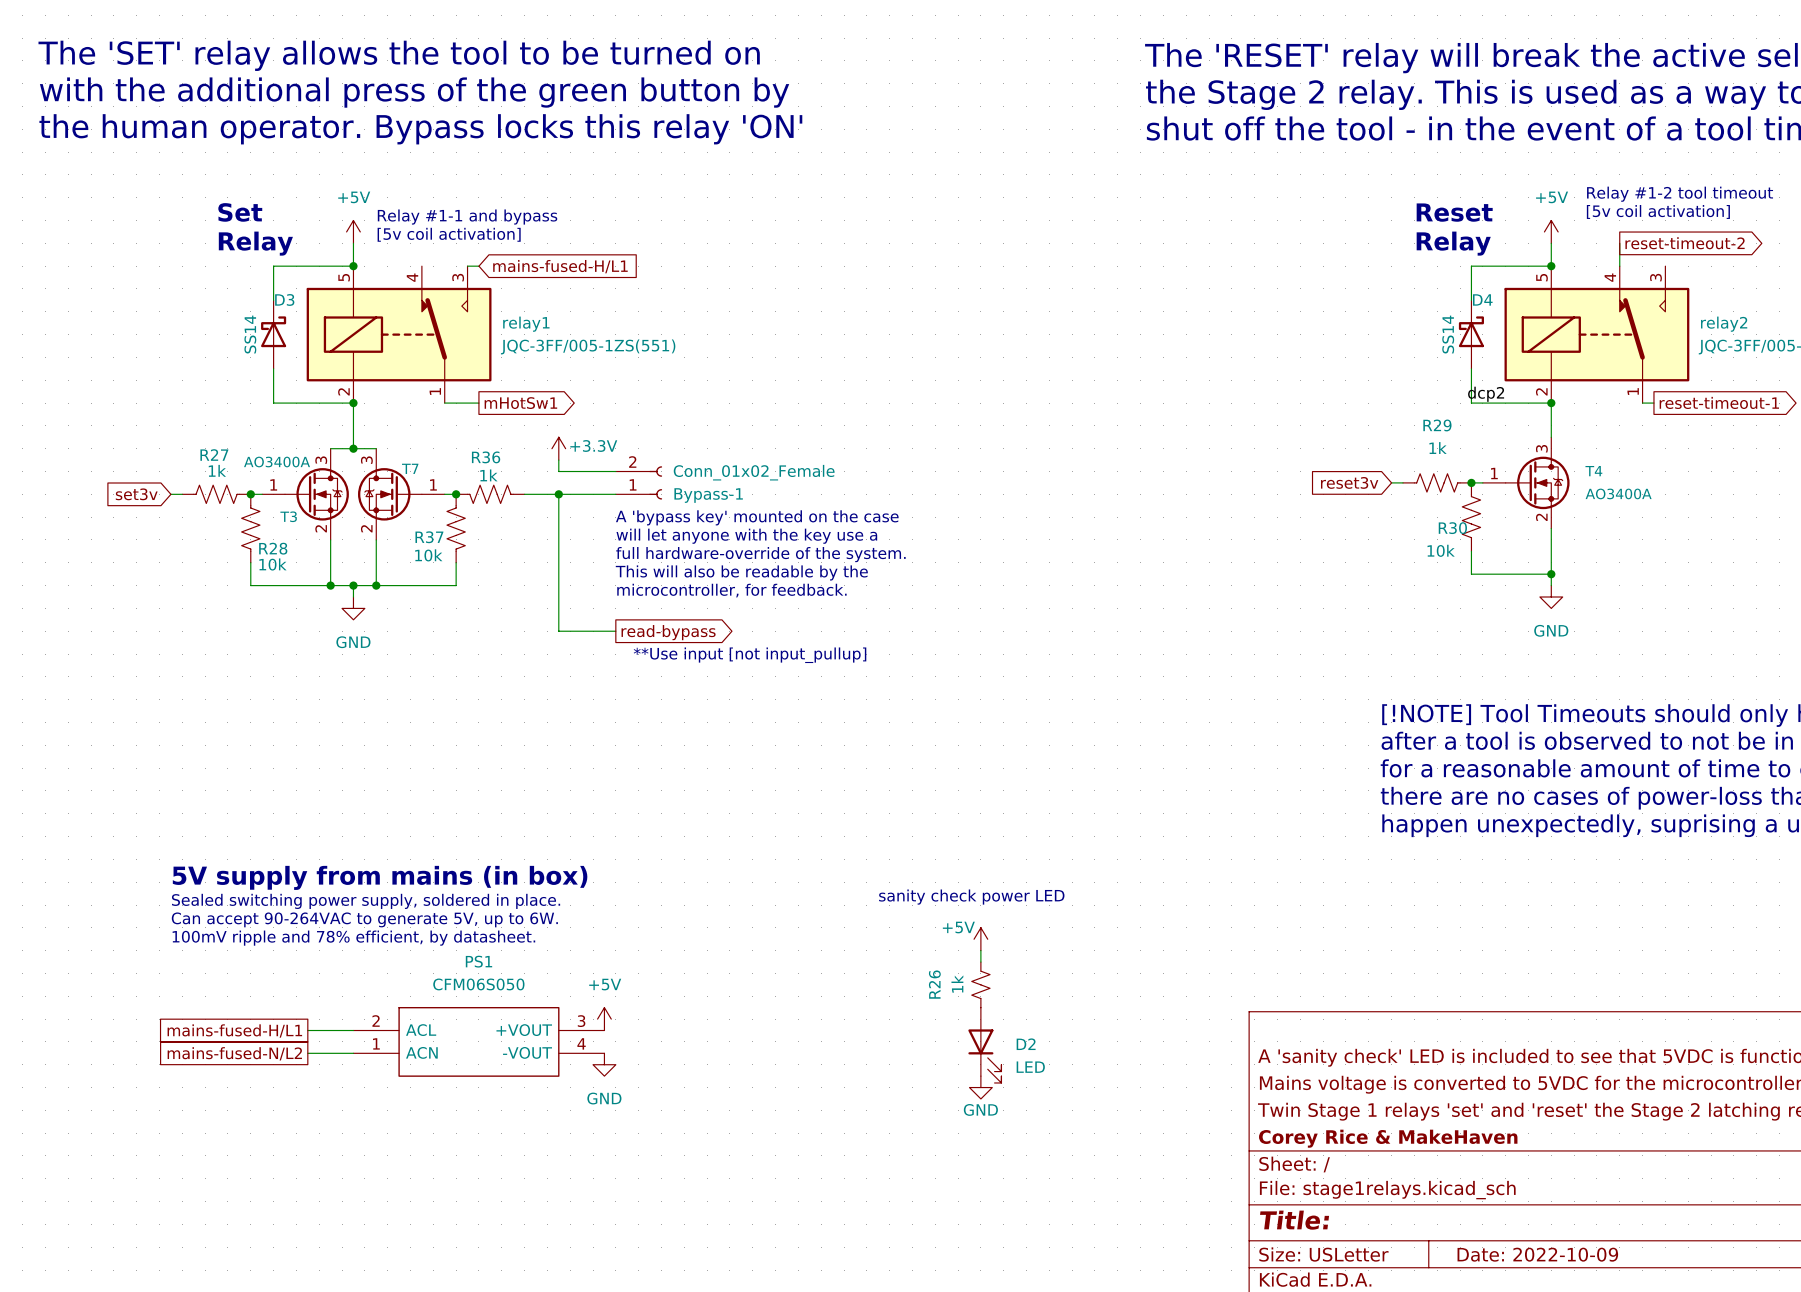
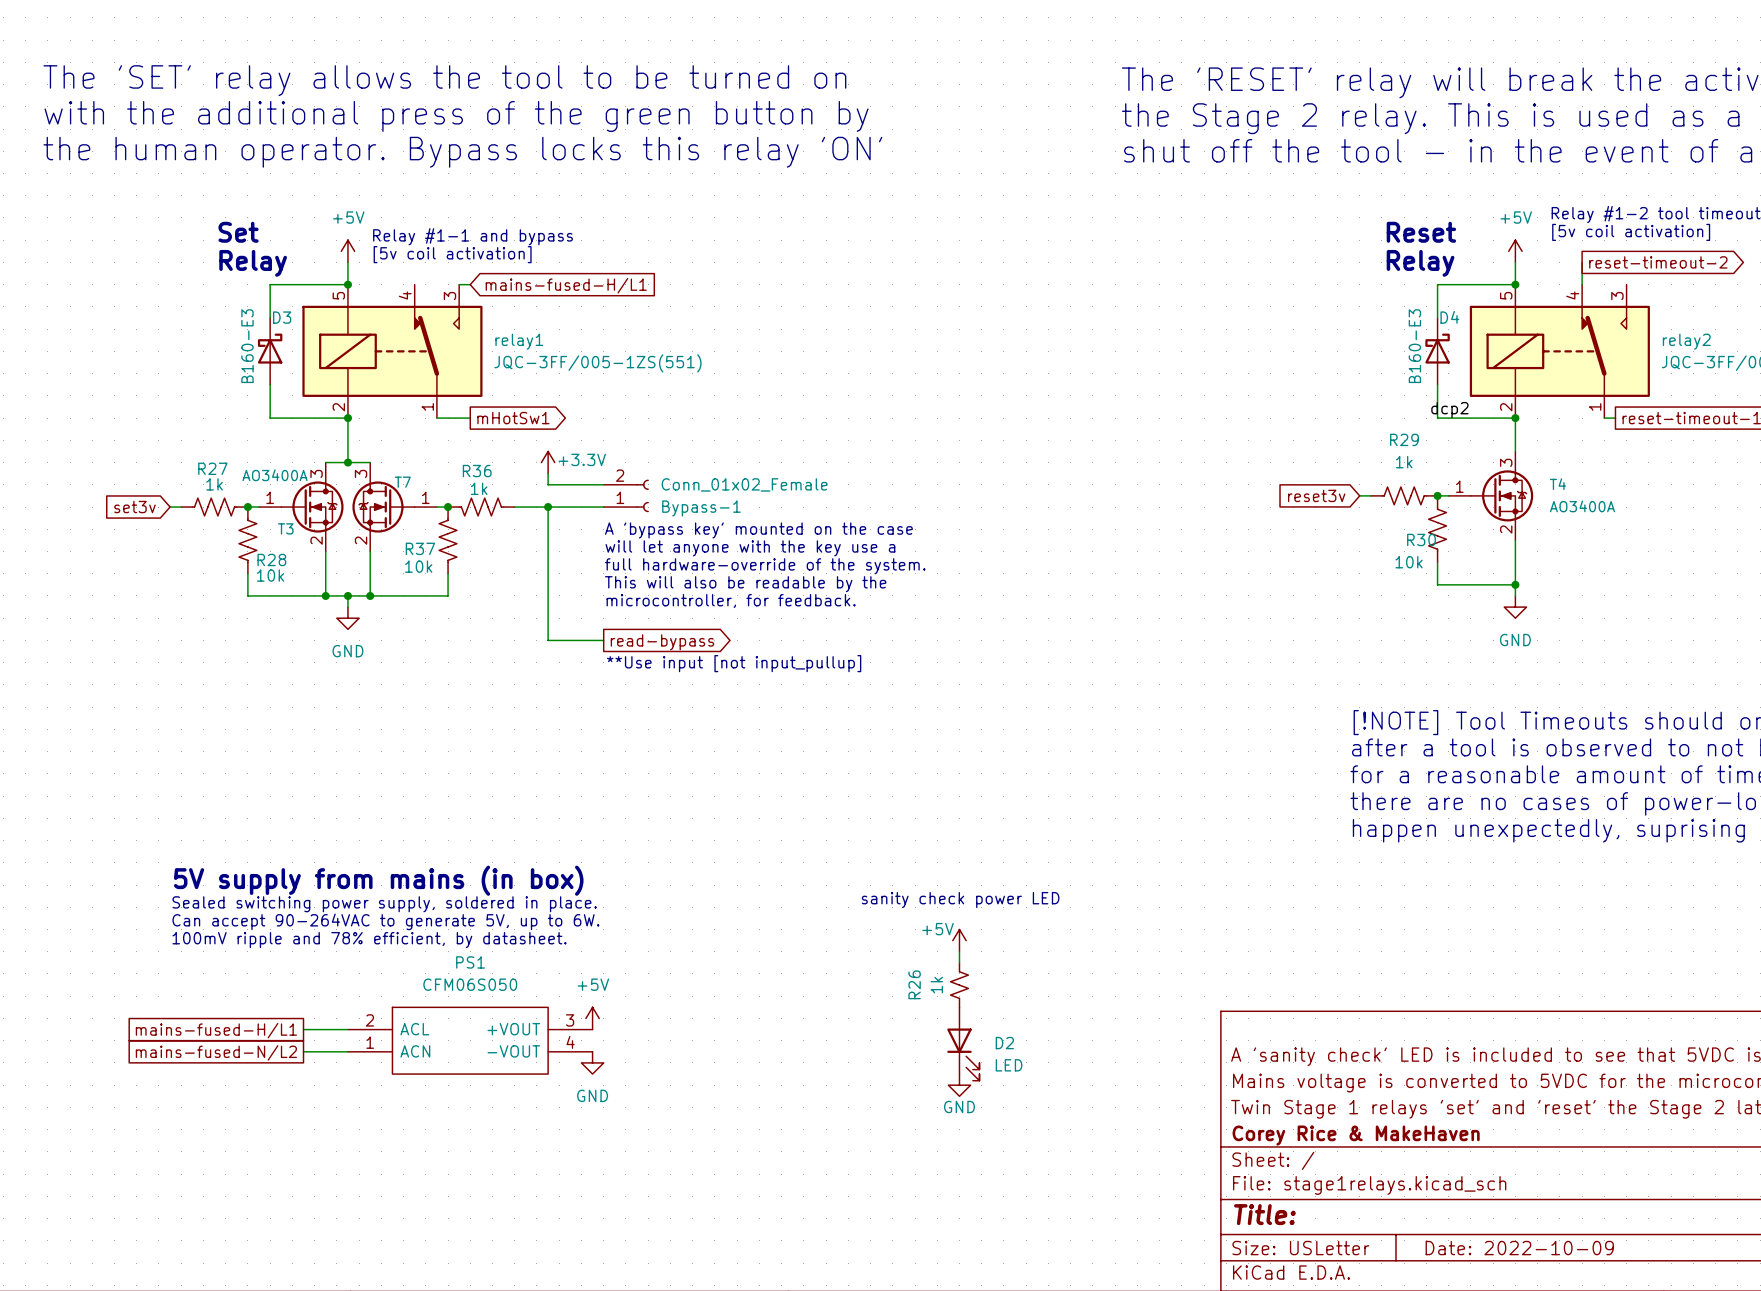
D3 value: SS14 (250, 334) -> B160-E3 (247, 346)
D4 value: SS14 (1448, 334) -> B160-E3 (1414, 346)

